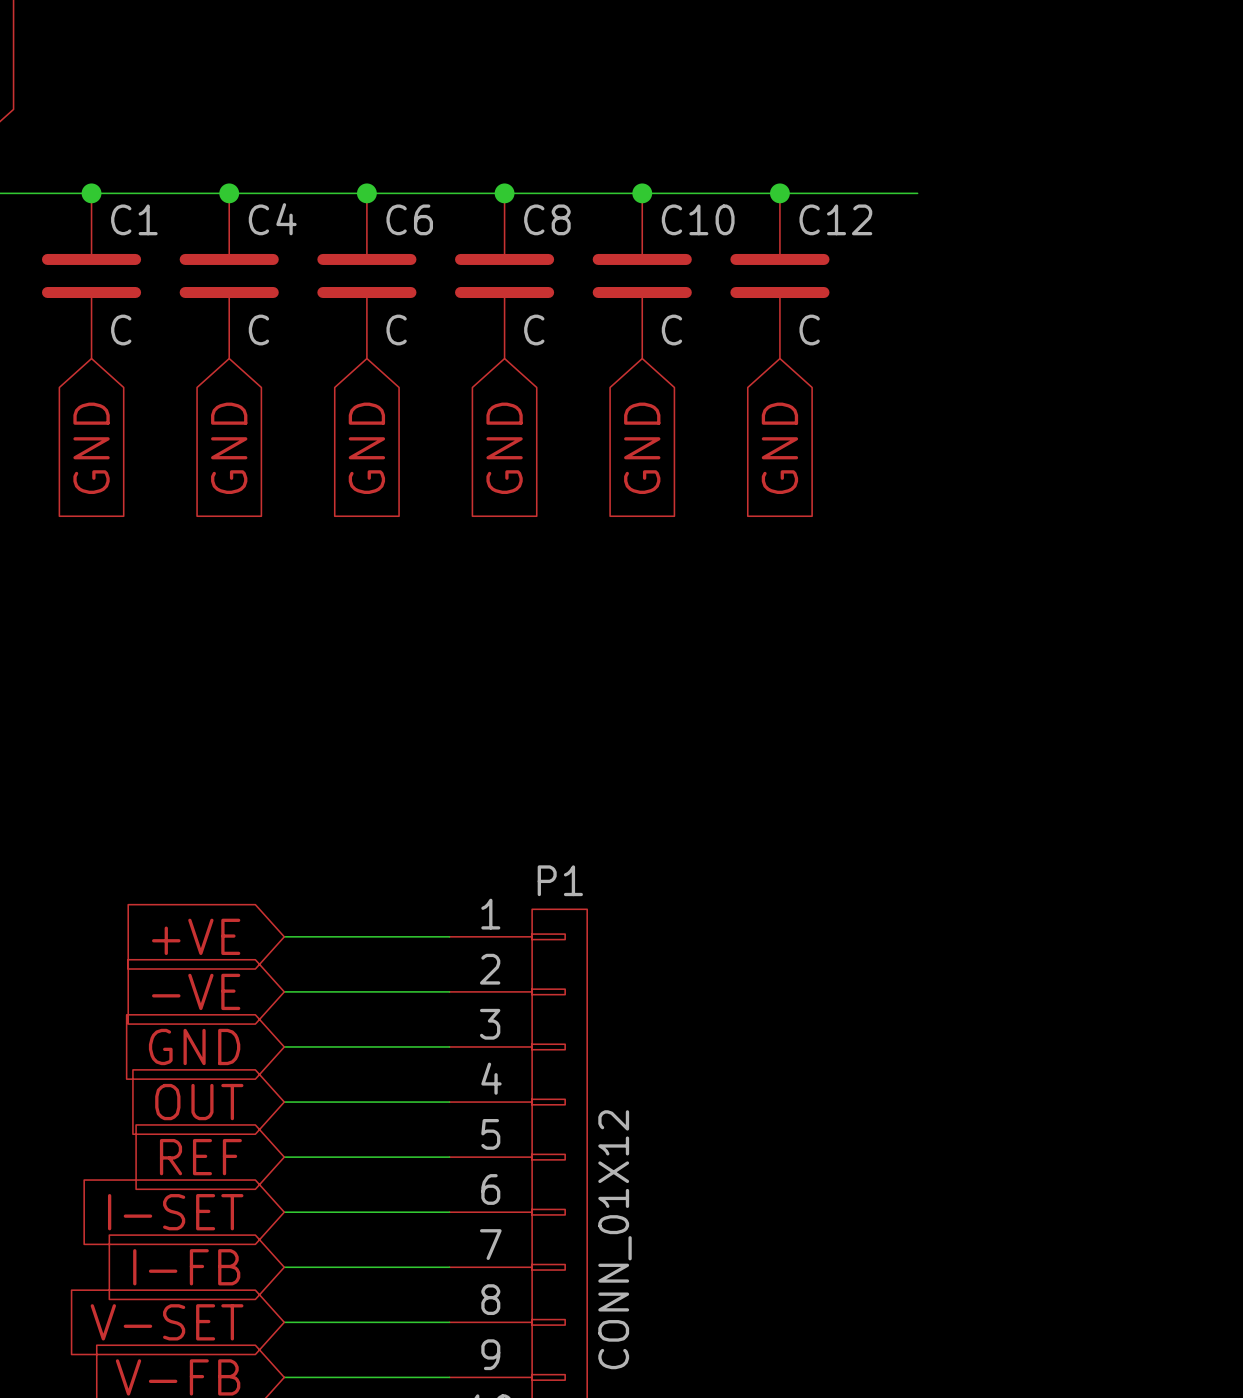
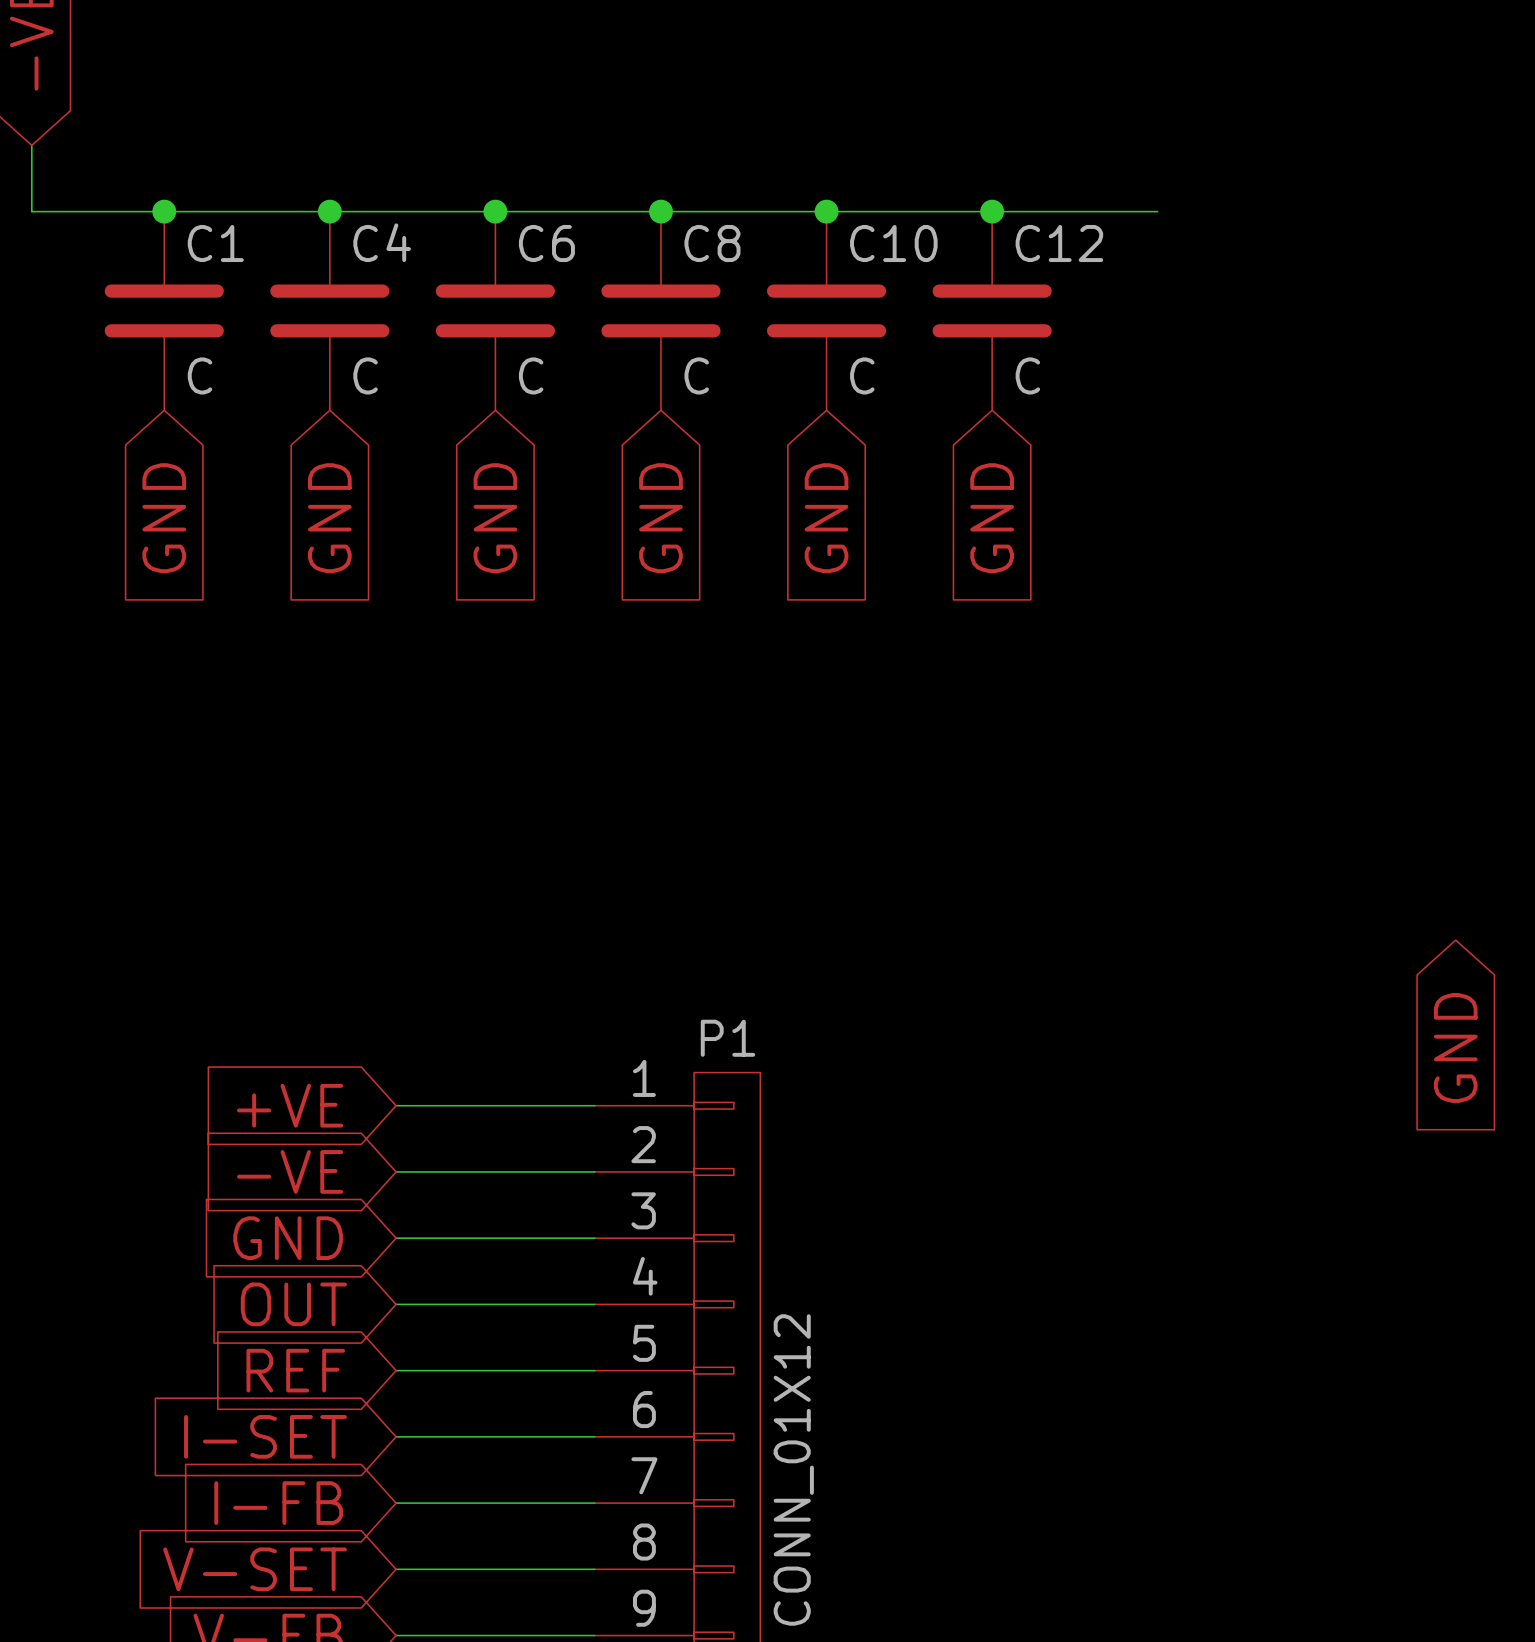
global label: none -> GND (1455, 1048)

